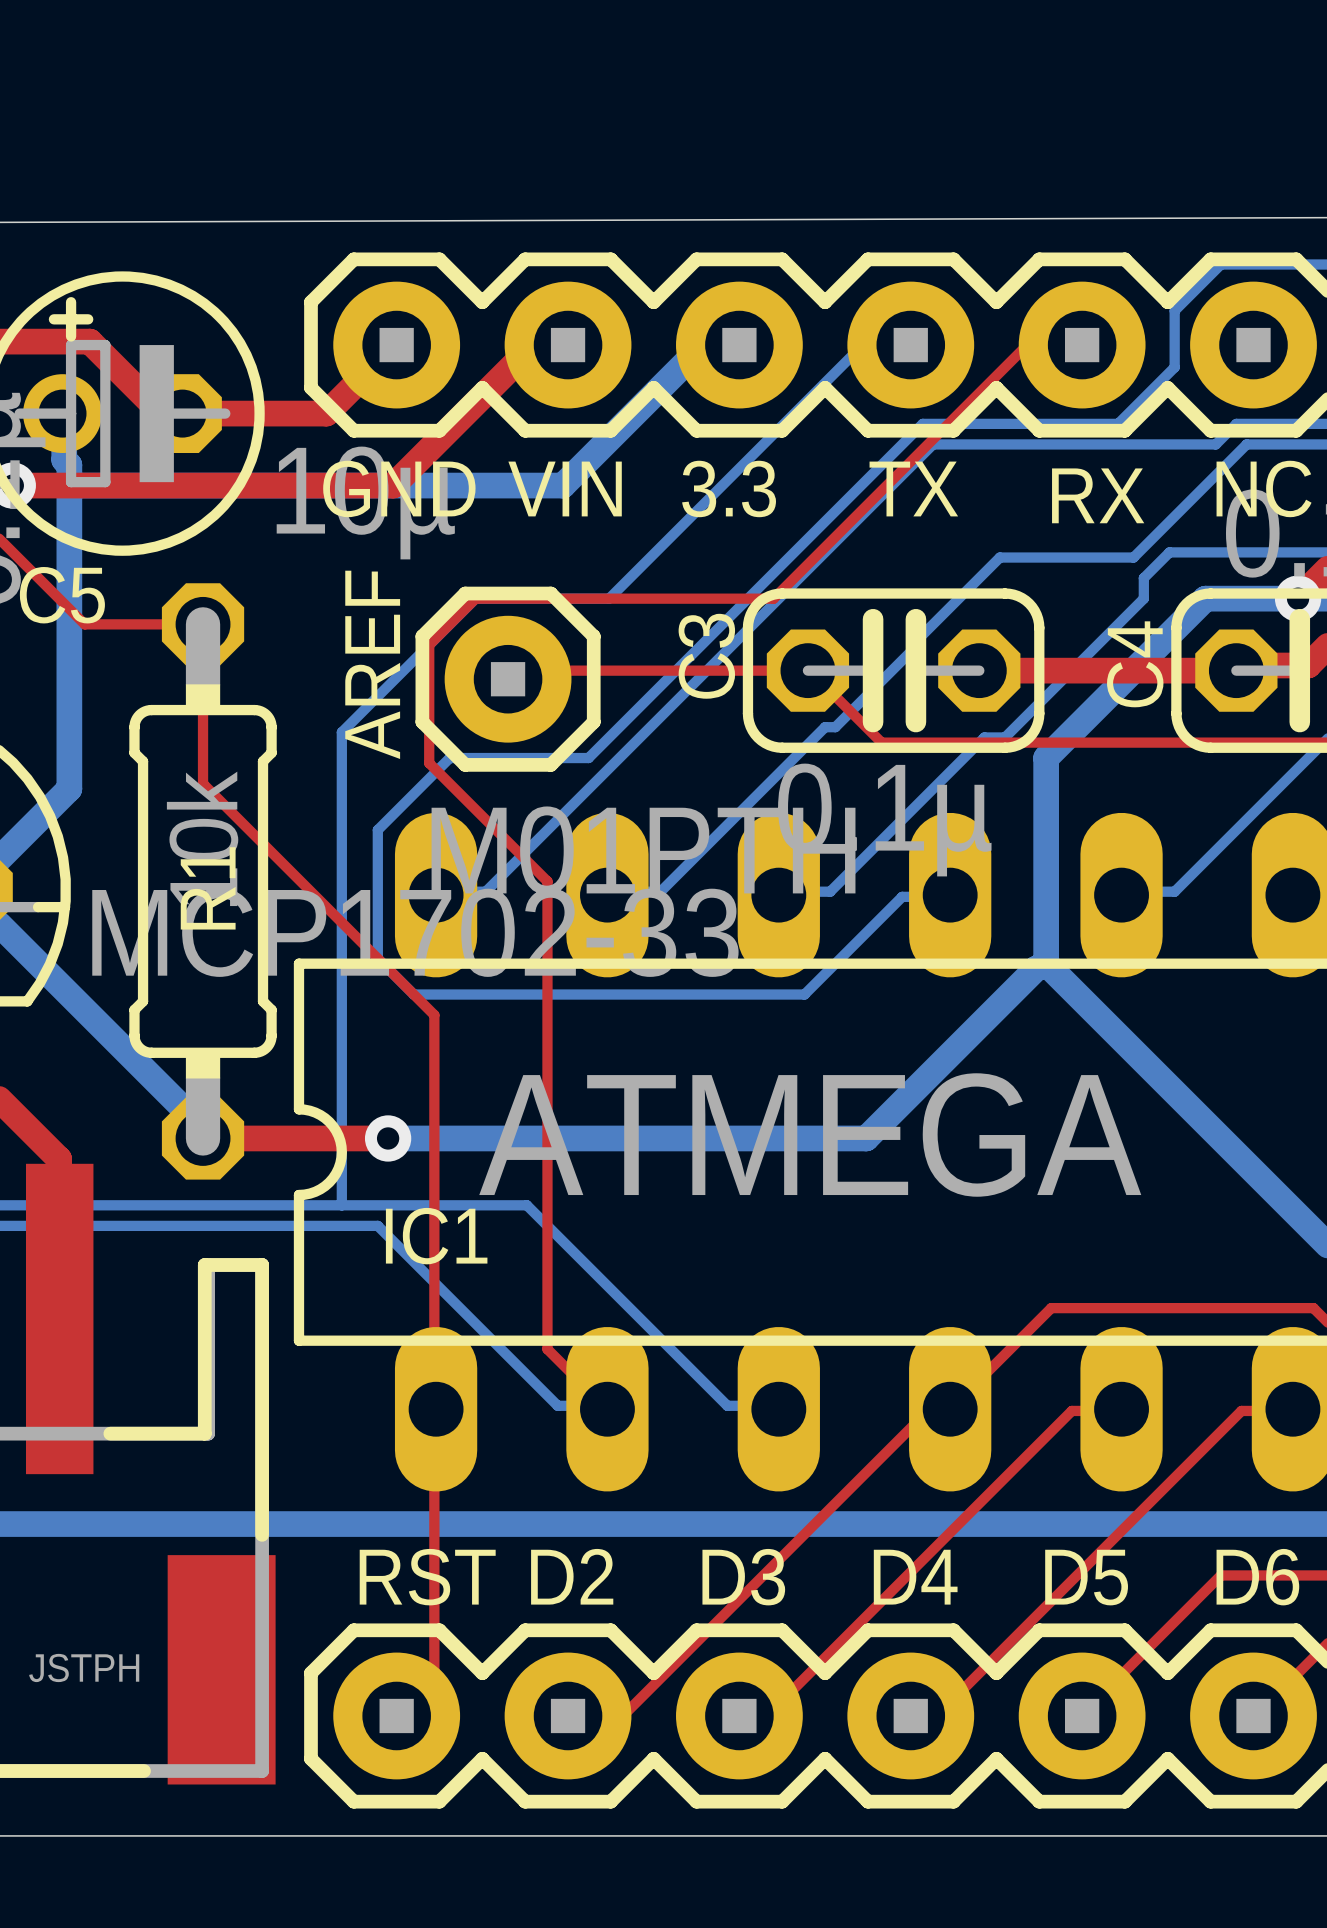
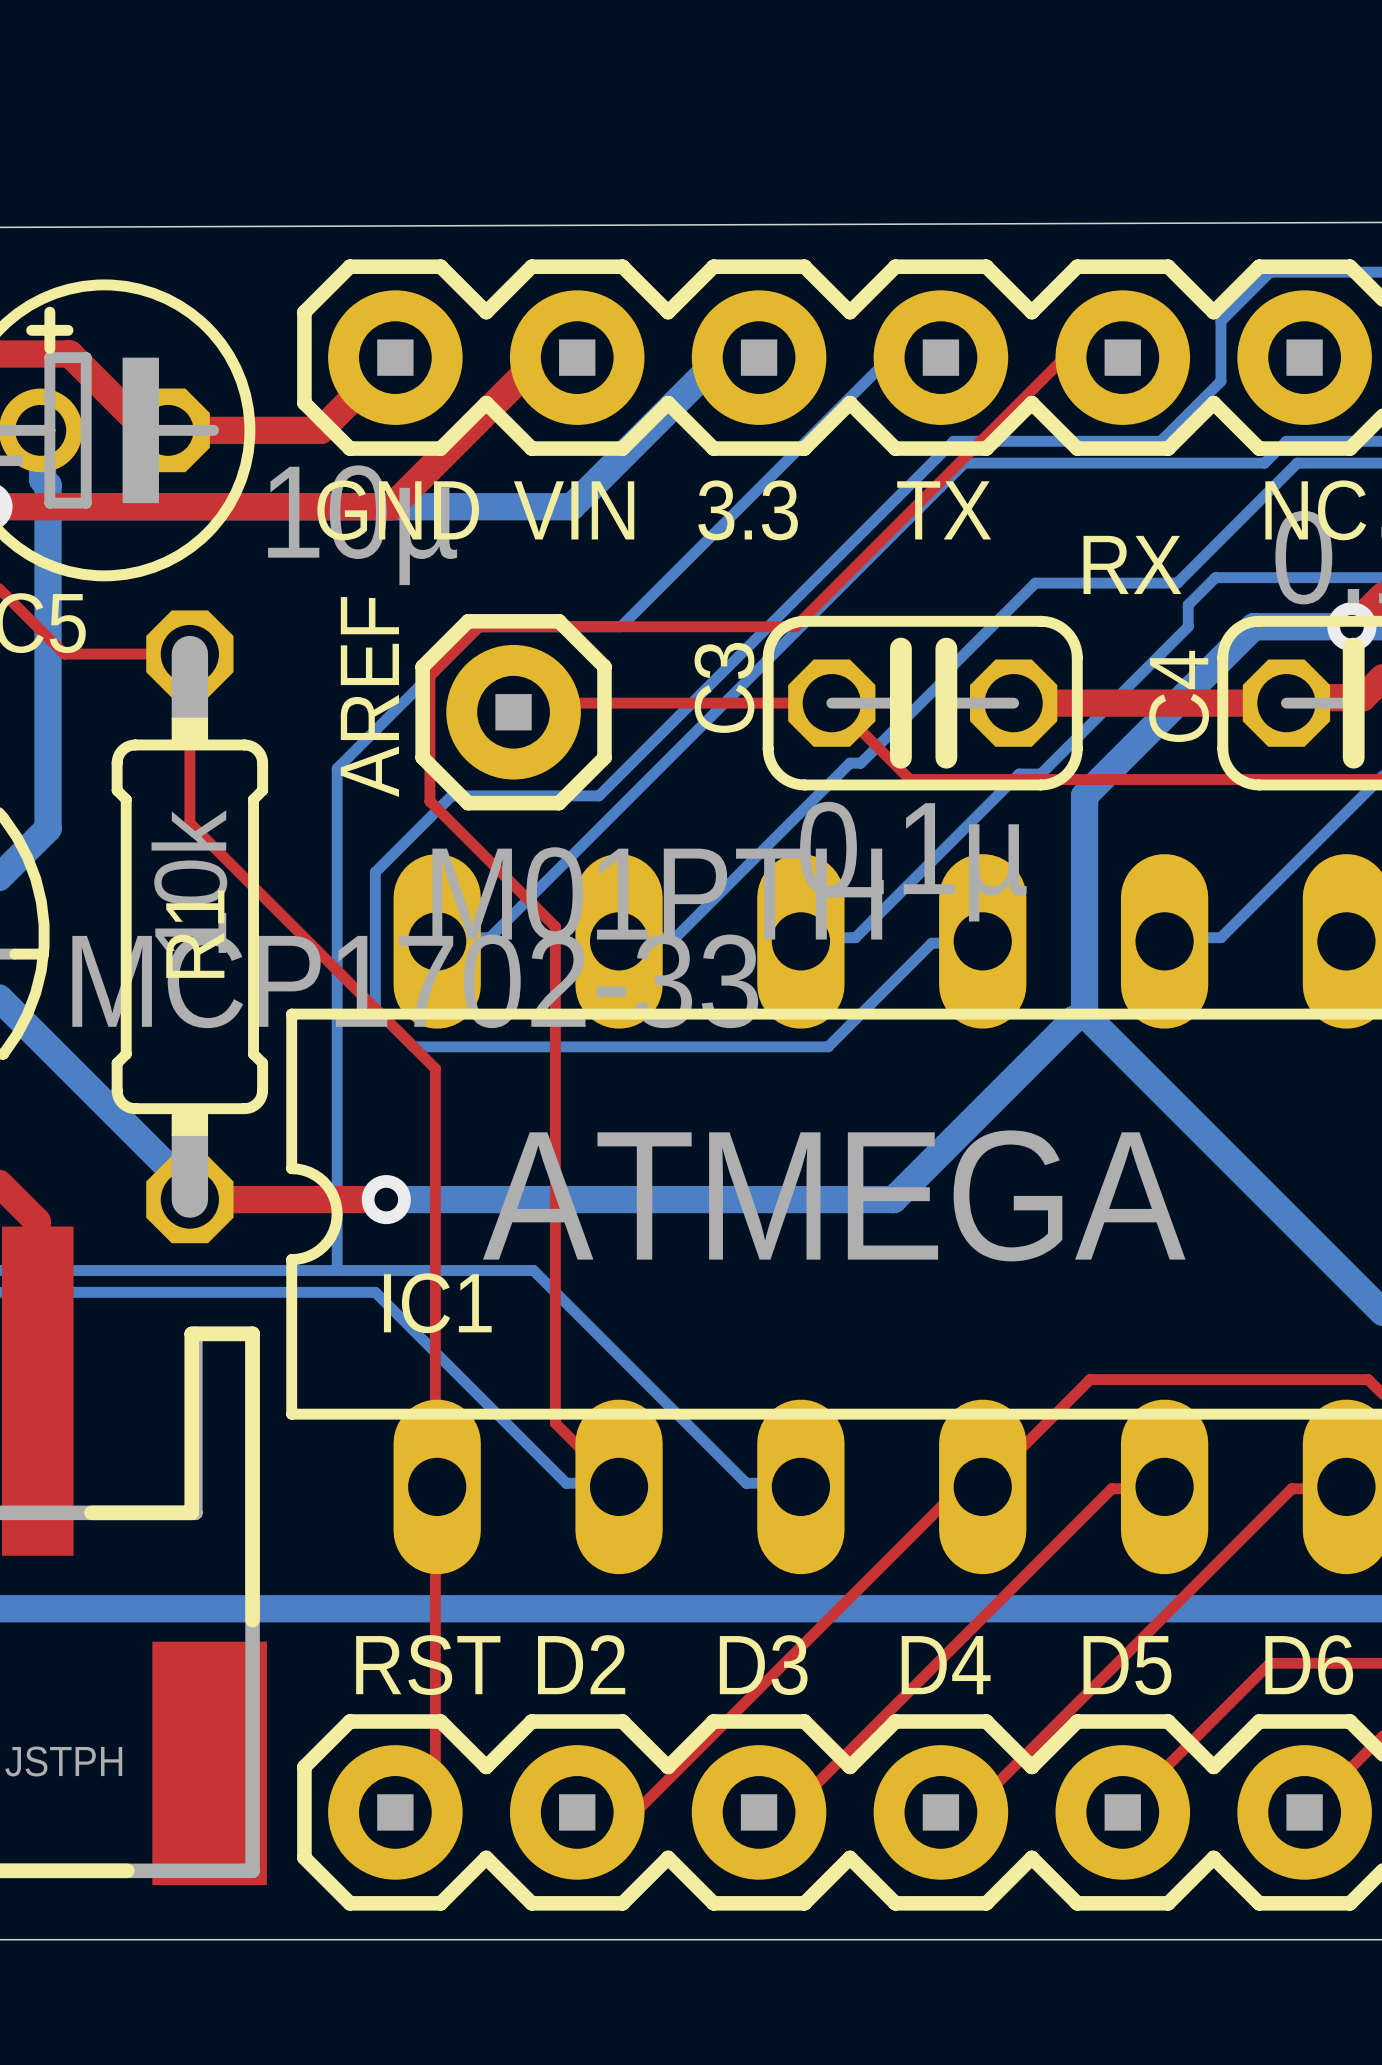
text position: RX (1098, 495) -> RX (1132, 564)

